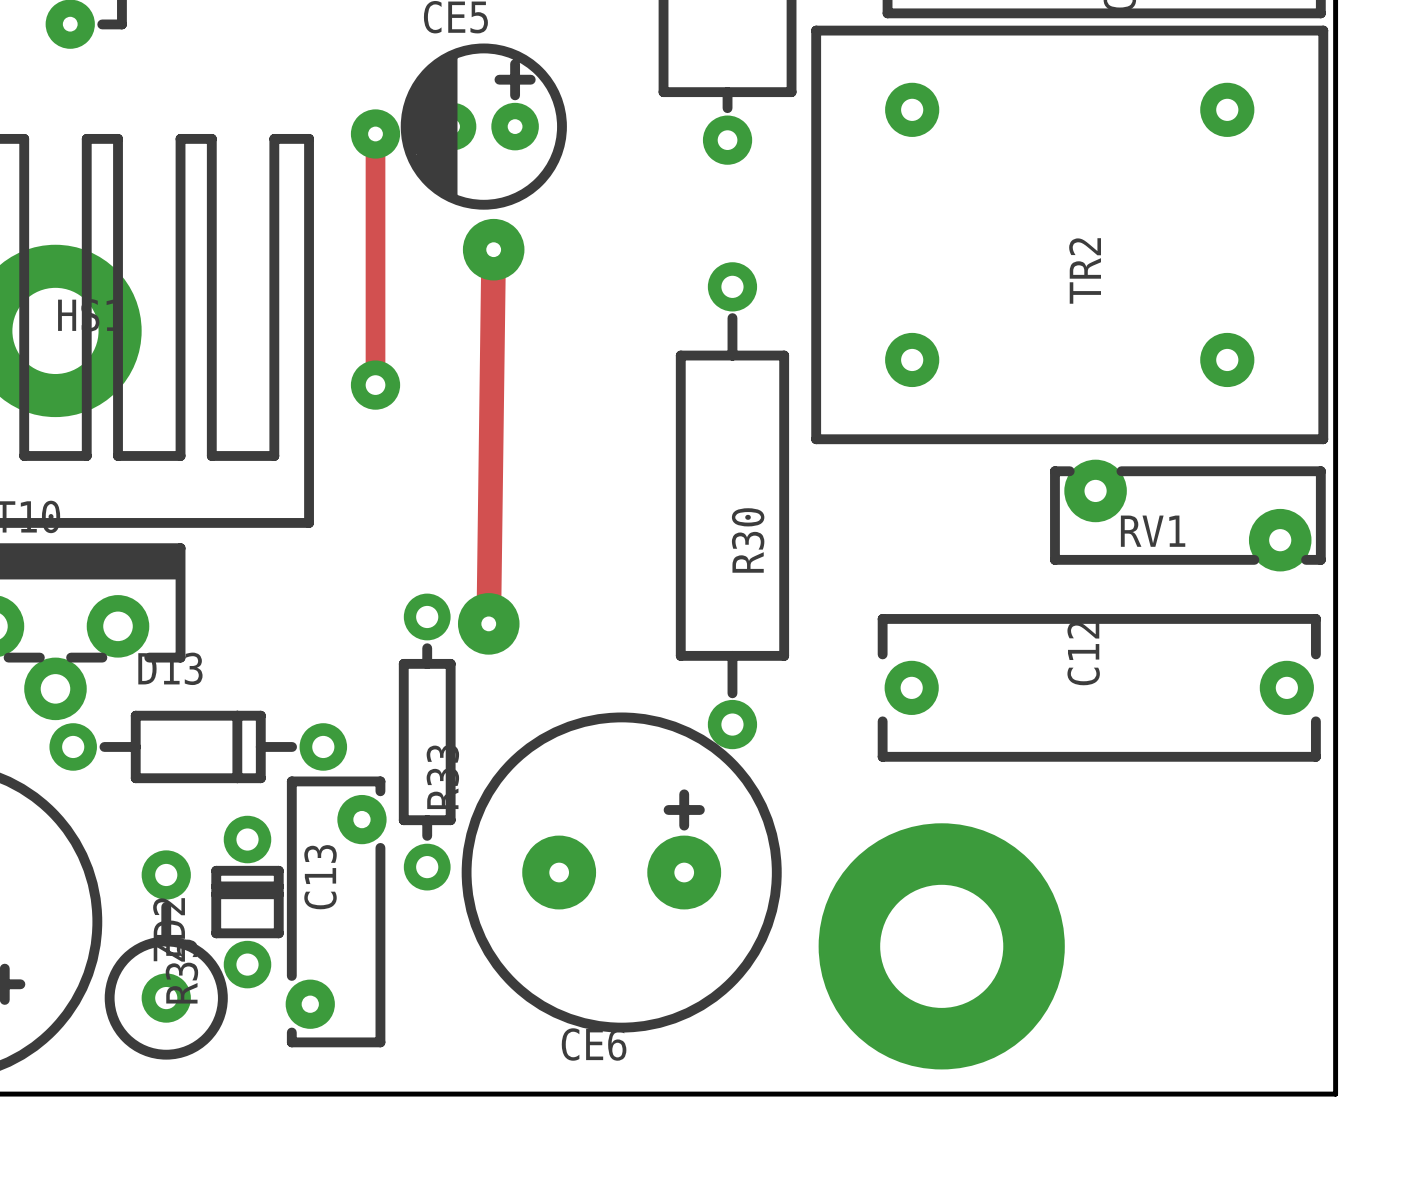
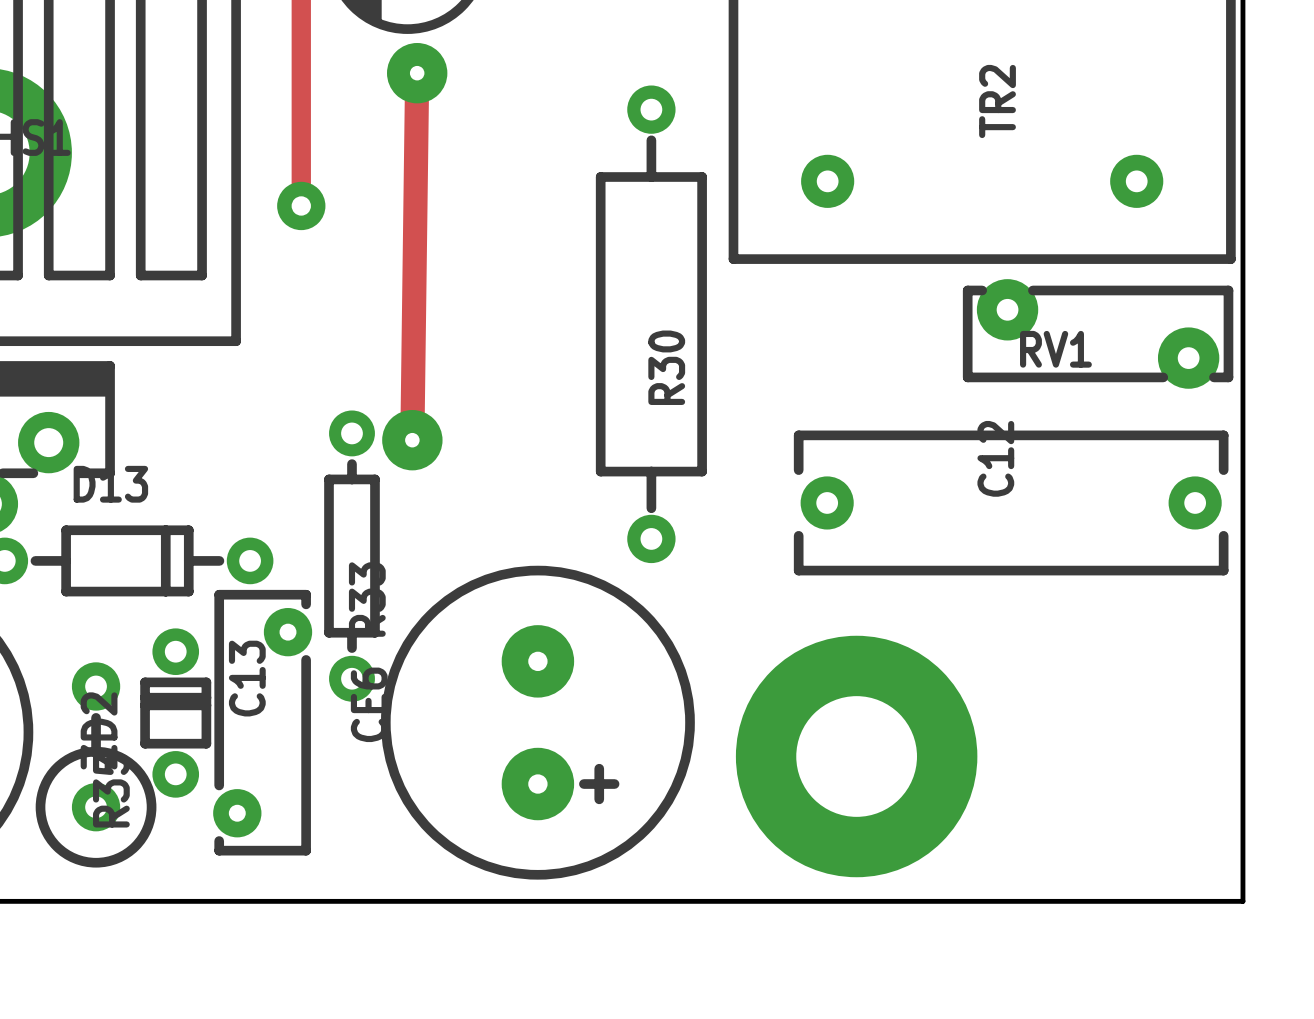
CE6 rotation: 0° (621, 872) -> 90° clockwise (537, 722)

